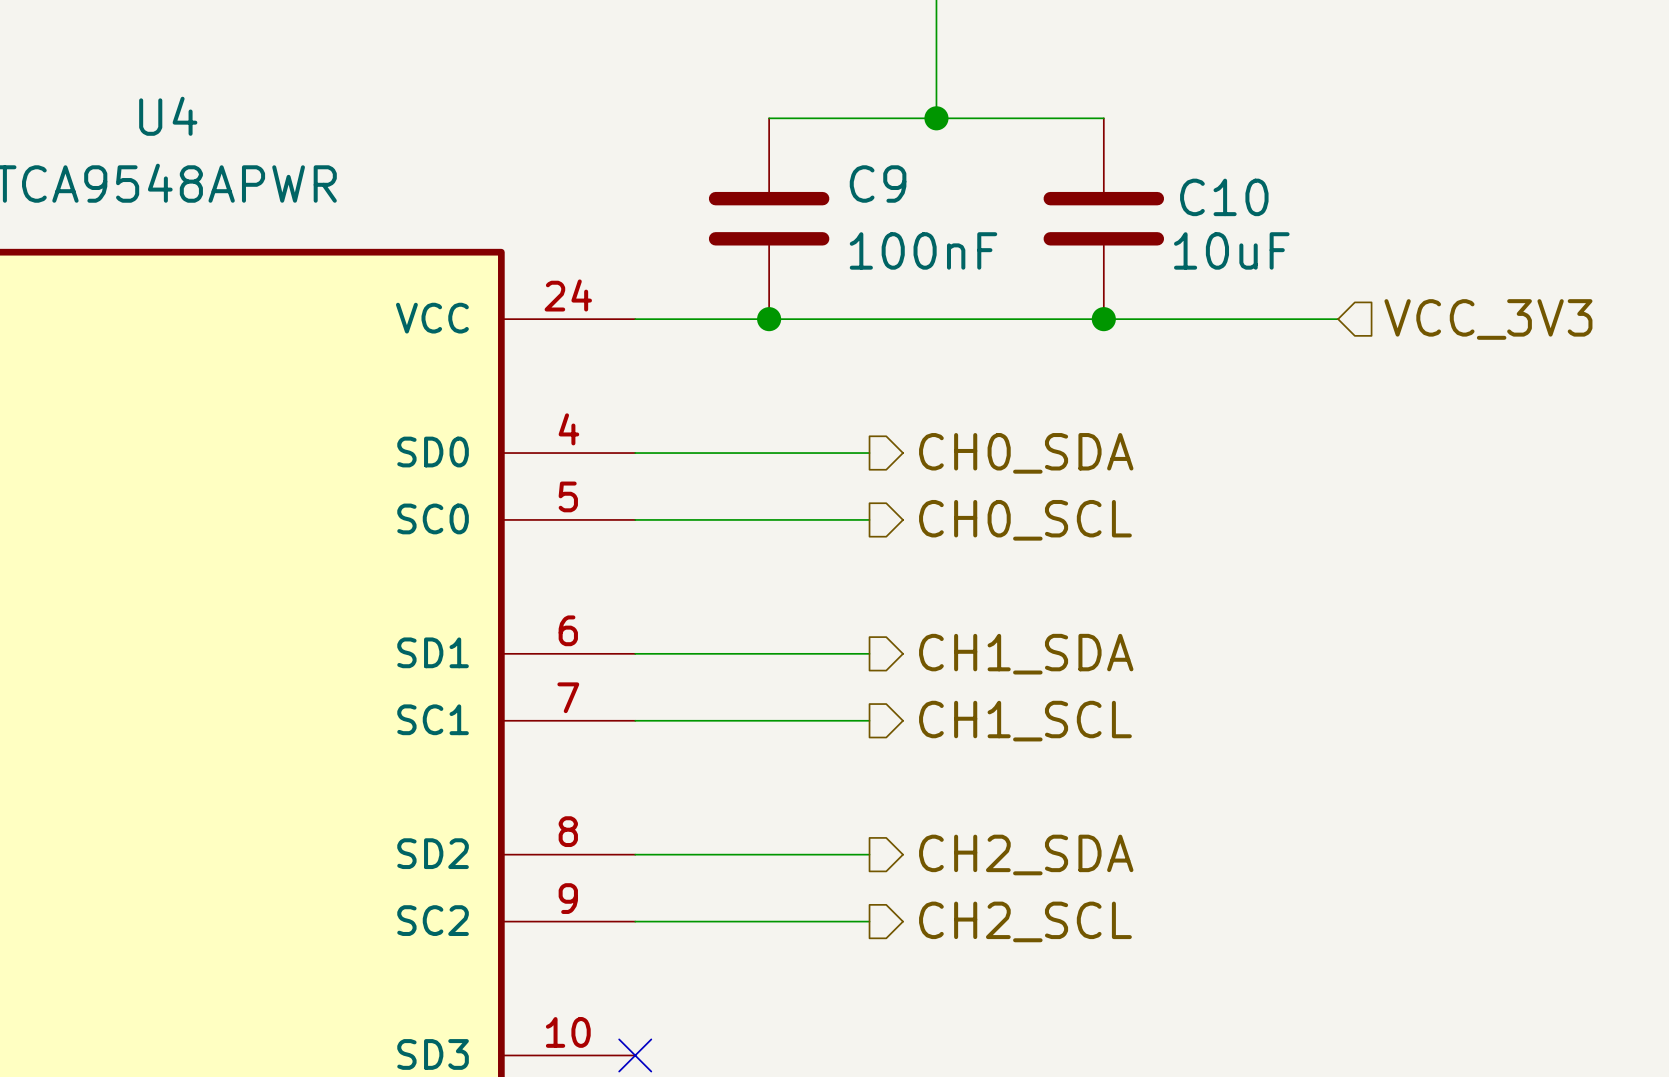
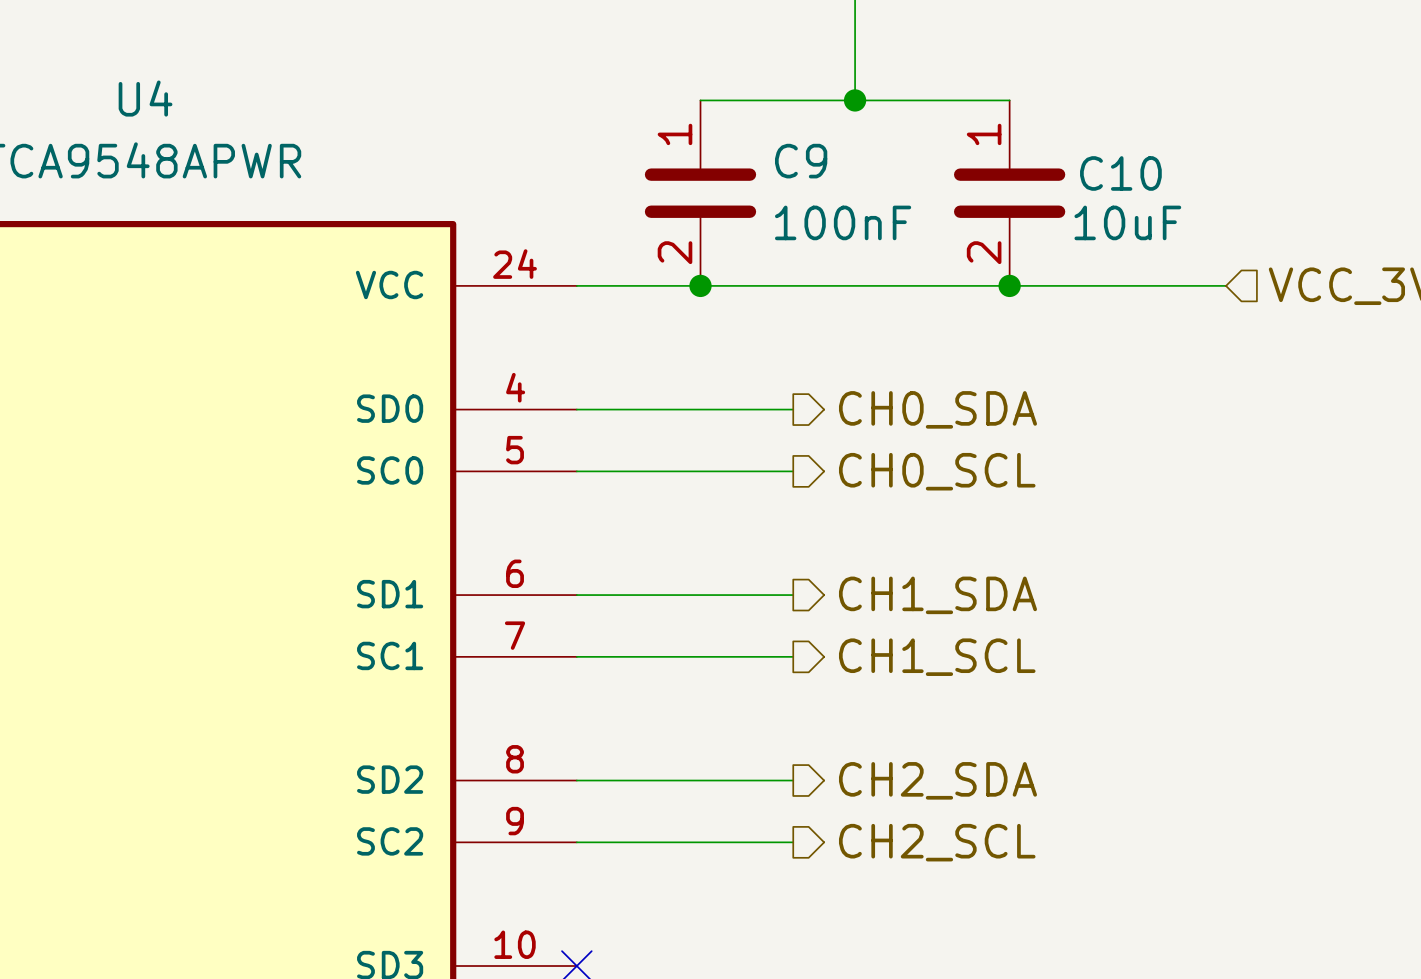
C9 pin number: none -> 1 (675, 134)
C10 pin number: none -> 1 (984, 134)
C9 pin number: none -> 2 (675, 252)
C10 pin number: none -> 2 (984, 252)

